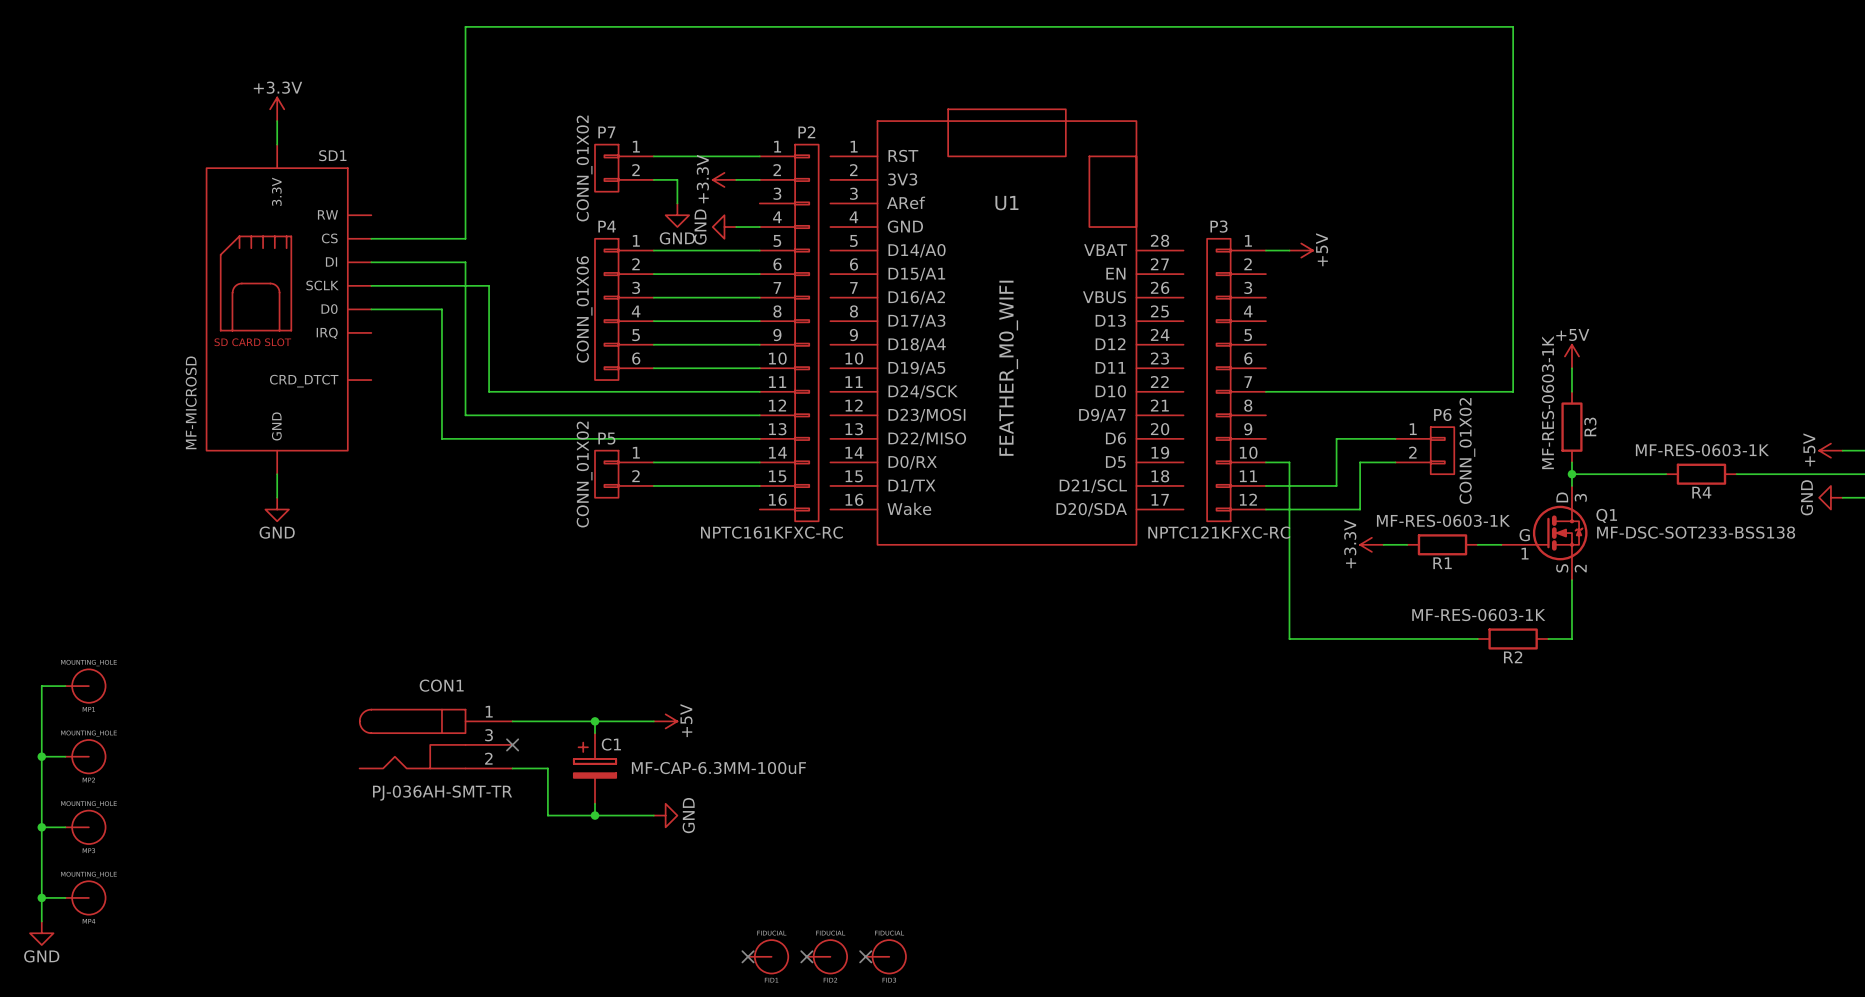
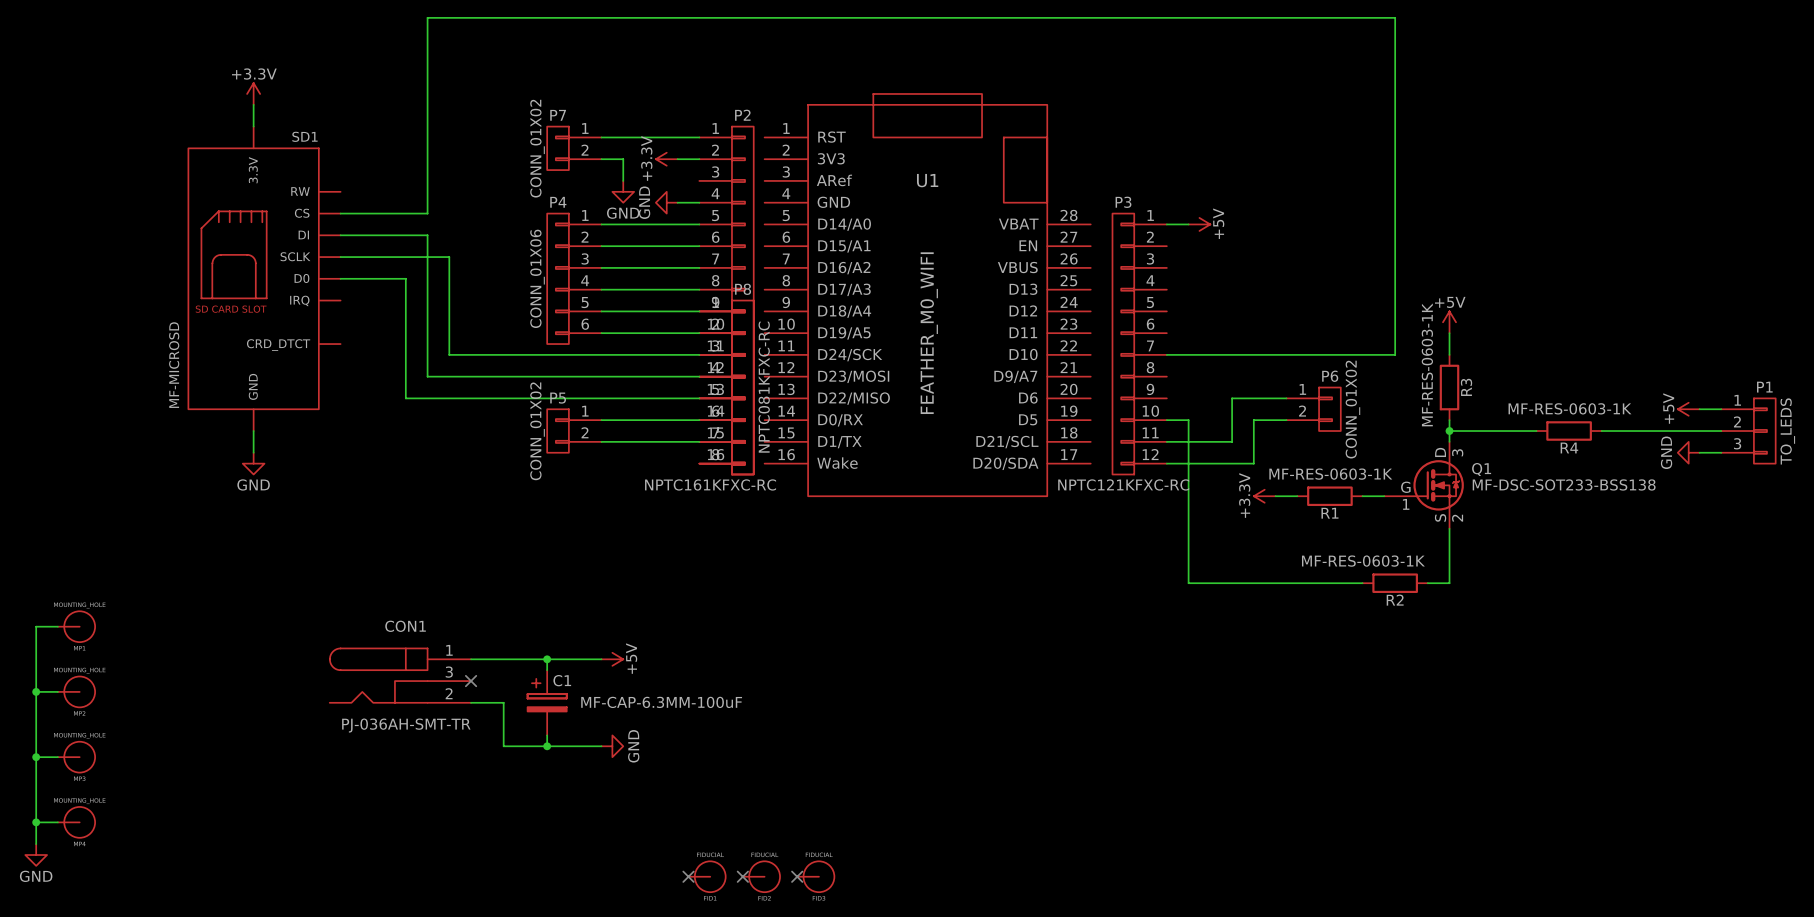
P8: none -> NPTC081KFXC-RC (726, 387)

